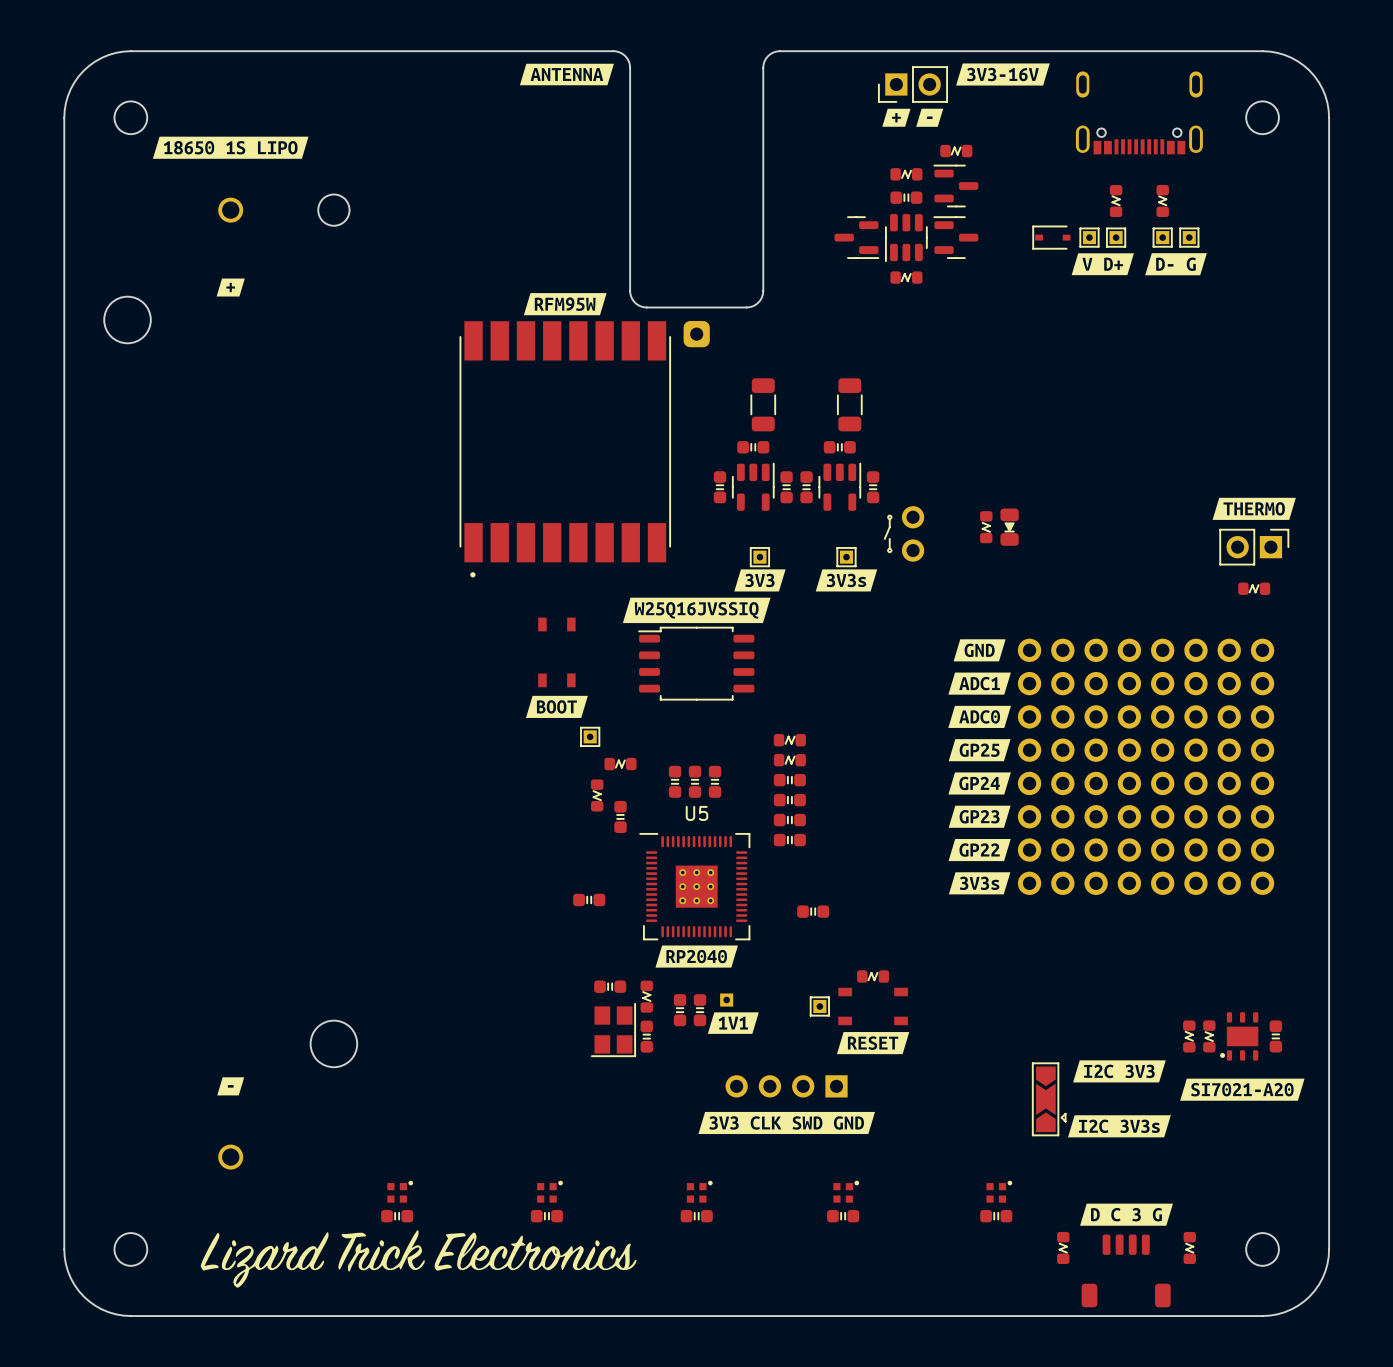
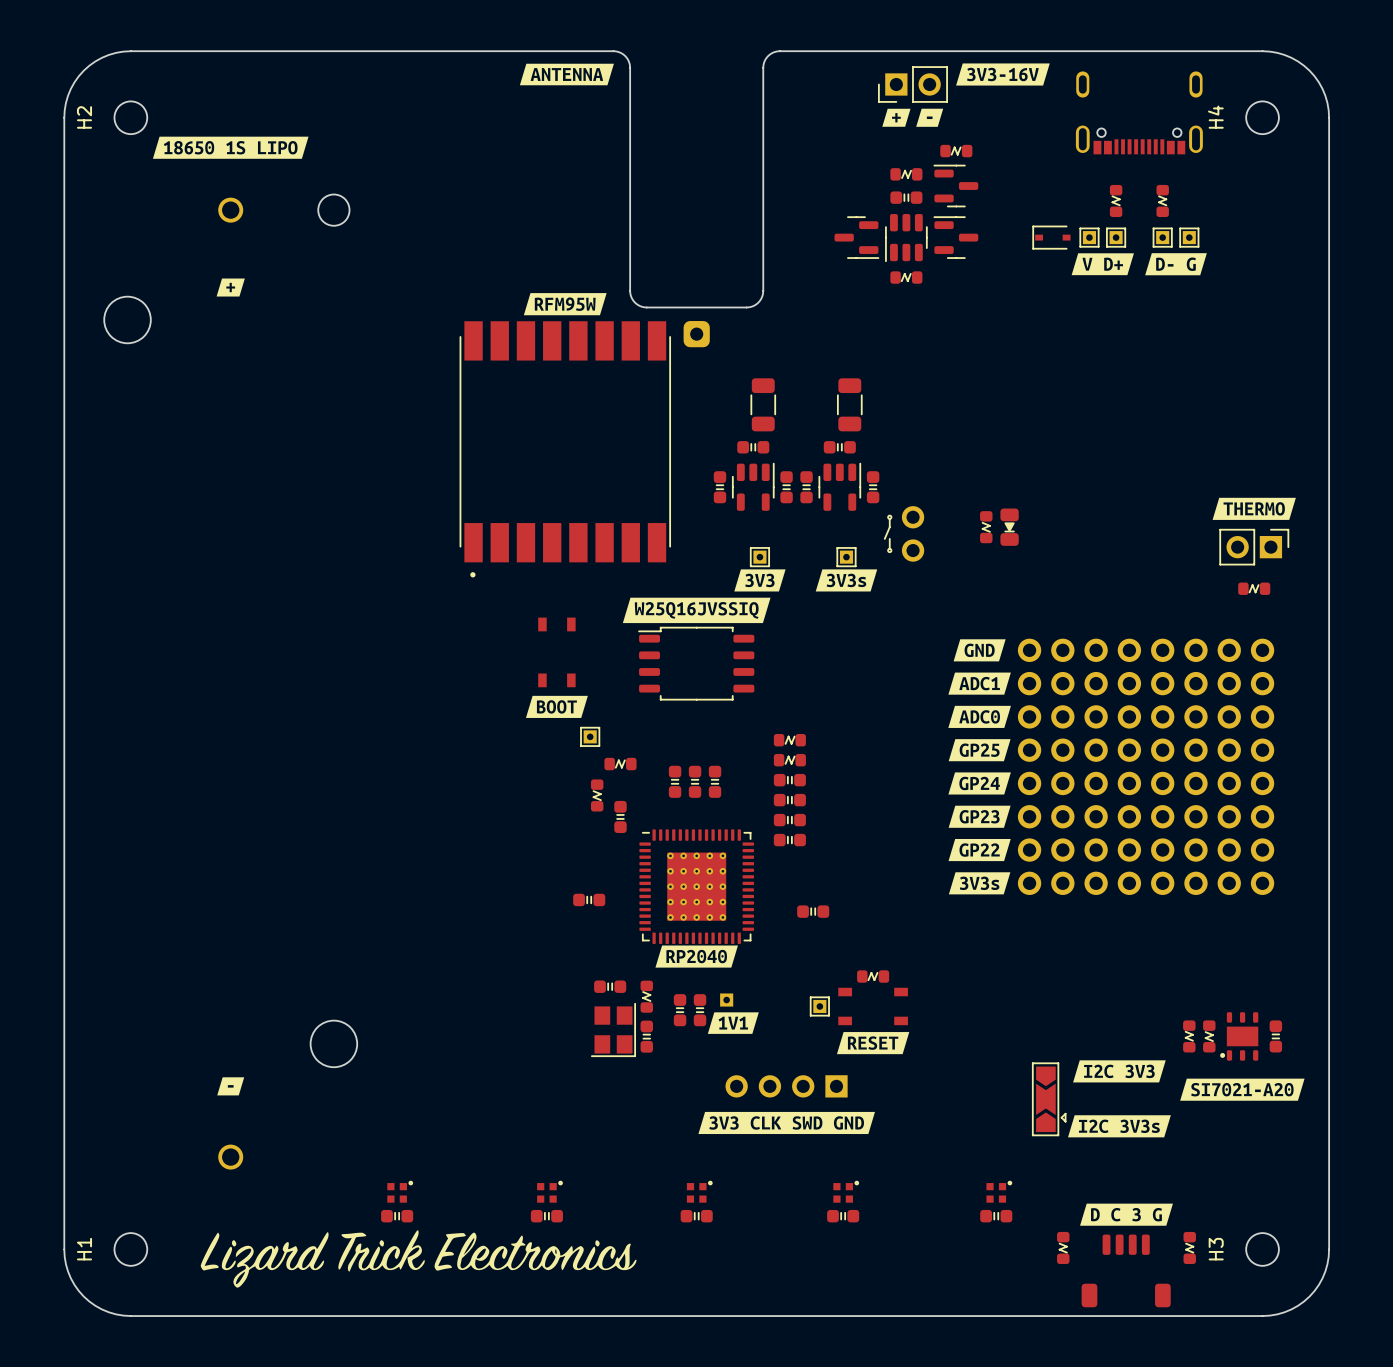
H2 name: none -> H2 (84, 117)
H4 name: none -> H4 (1215, 117)
U5: (694, 886) -> none
part: none -> (696, 886)
H1 name: none -> H1 (84, 1249)
H3 name: none -> H3 (1216, 1249)

